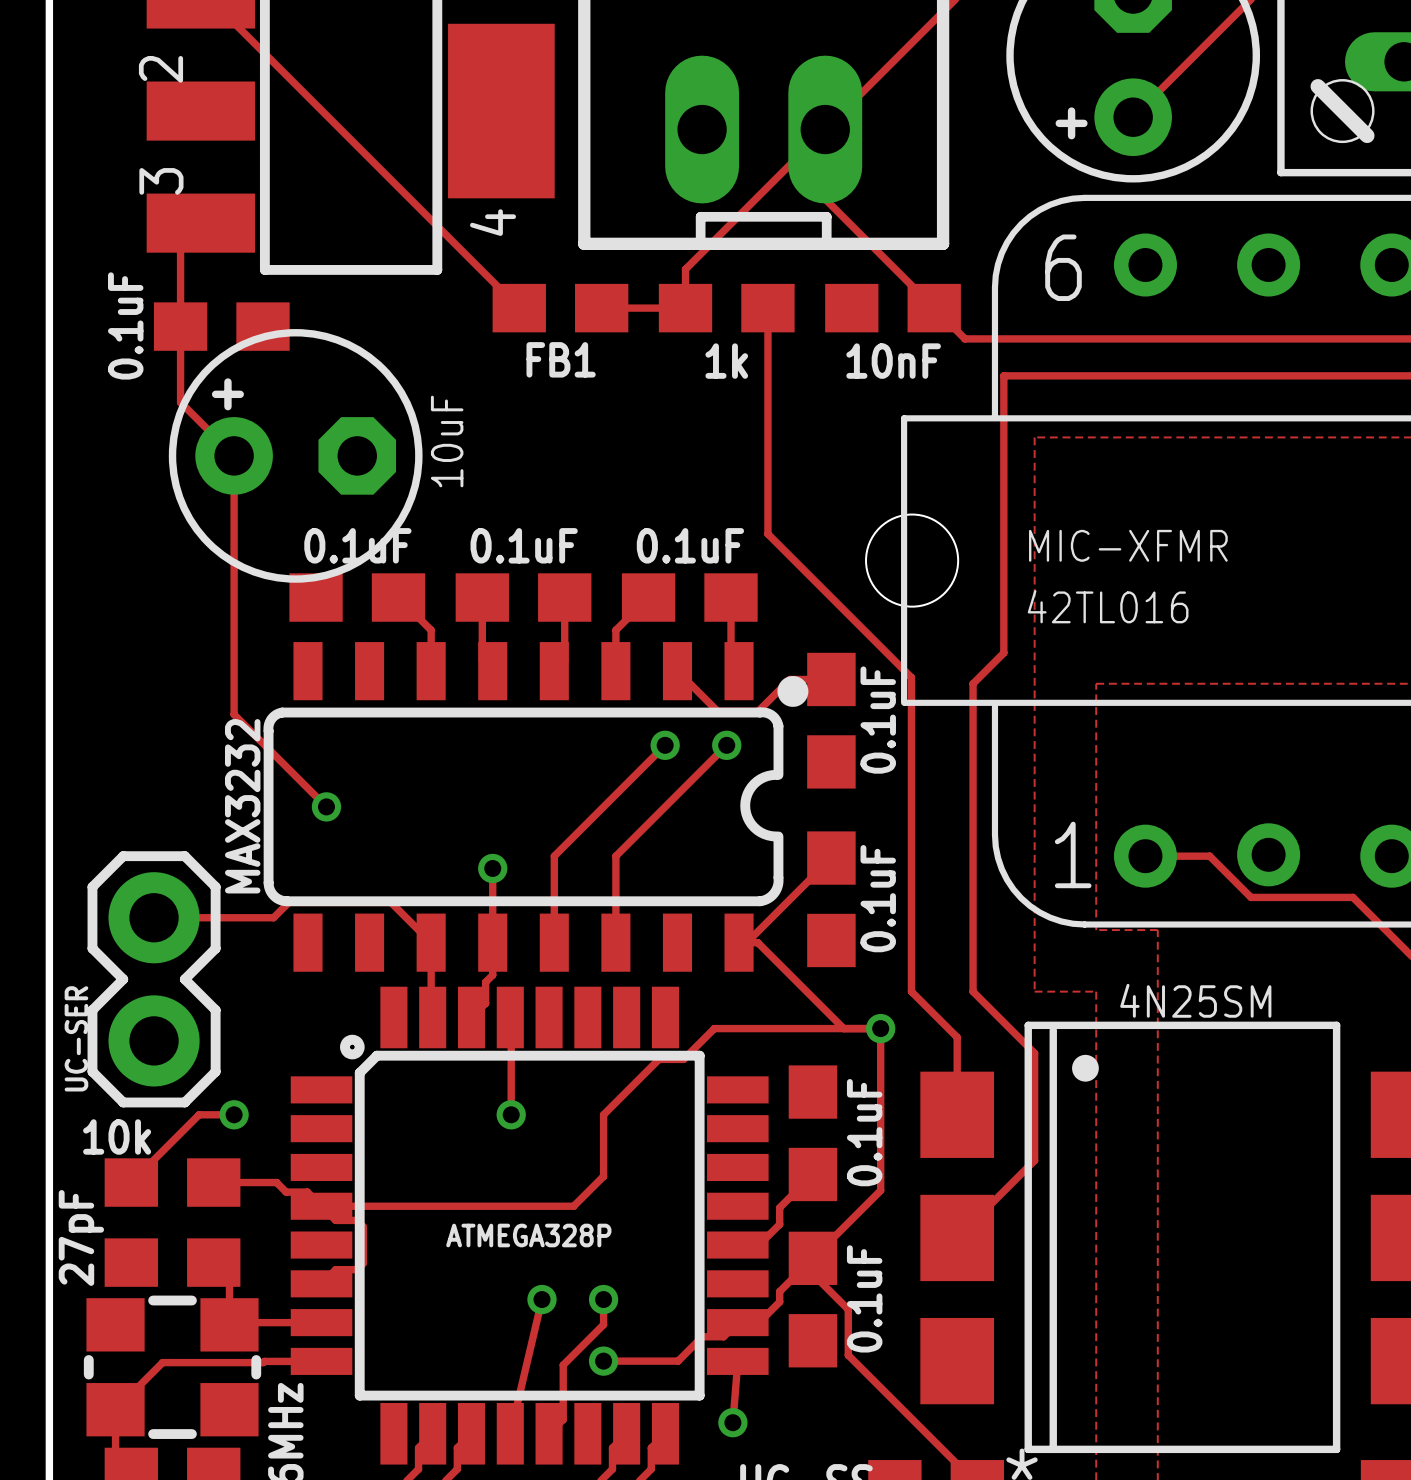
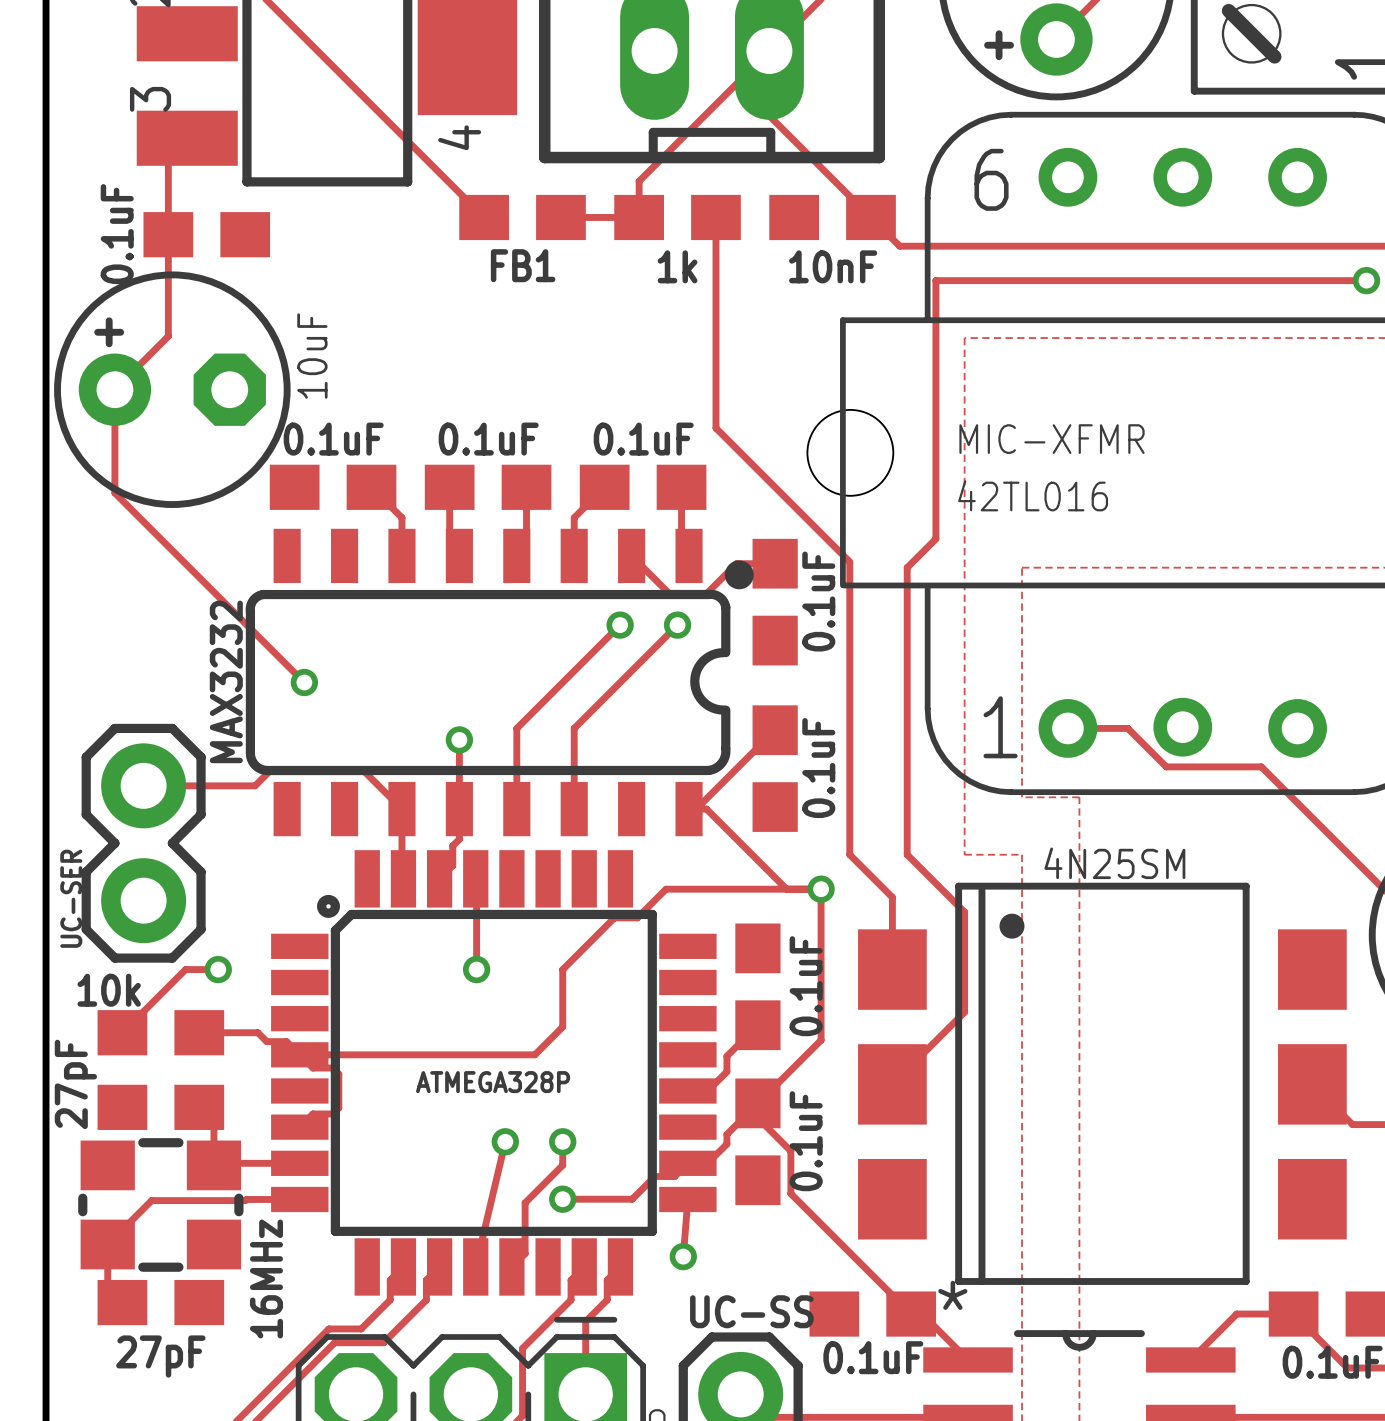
track: (180, 402) (234, 455) (234, 714) -> (168, 305) (168, 336) (114, 389) (114, 493) (218, 596)
part value position: 10uF (447, 441) -> 10uF (312, 356)
part position: (295, 455) -> (172, 389)

